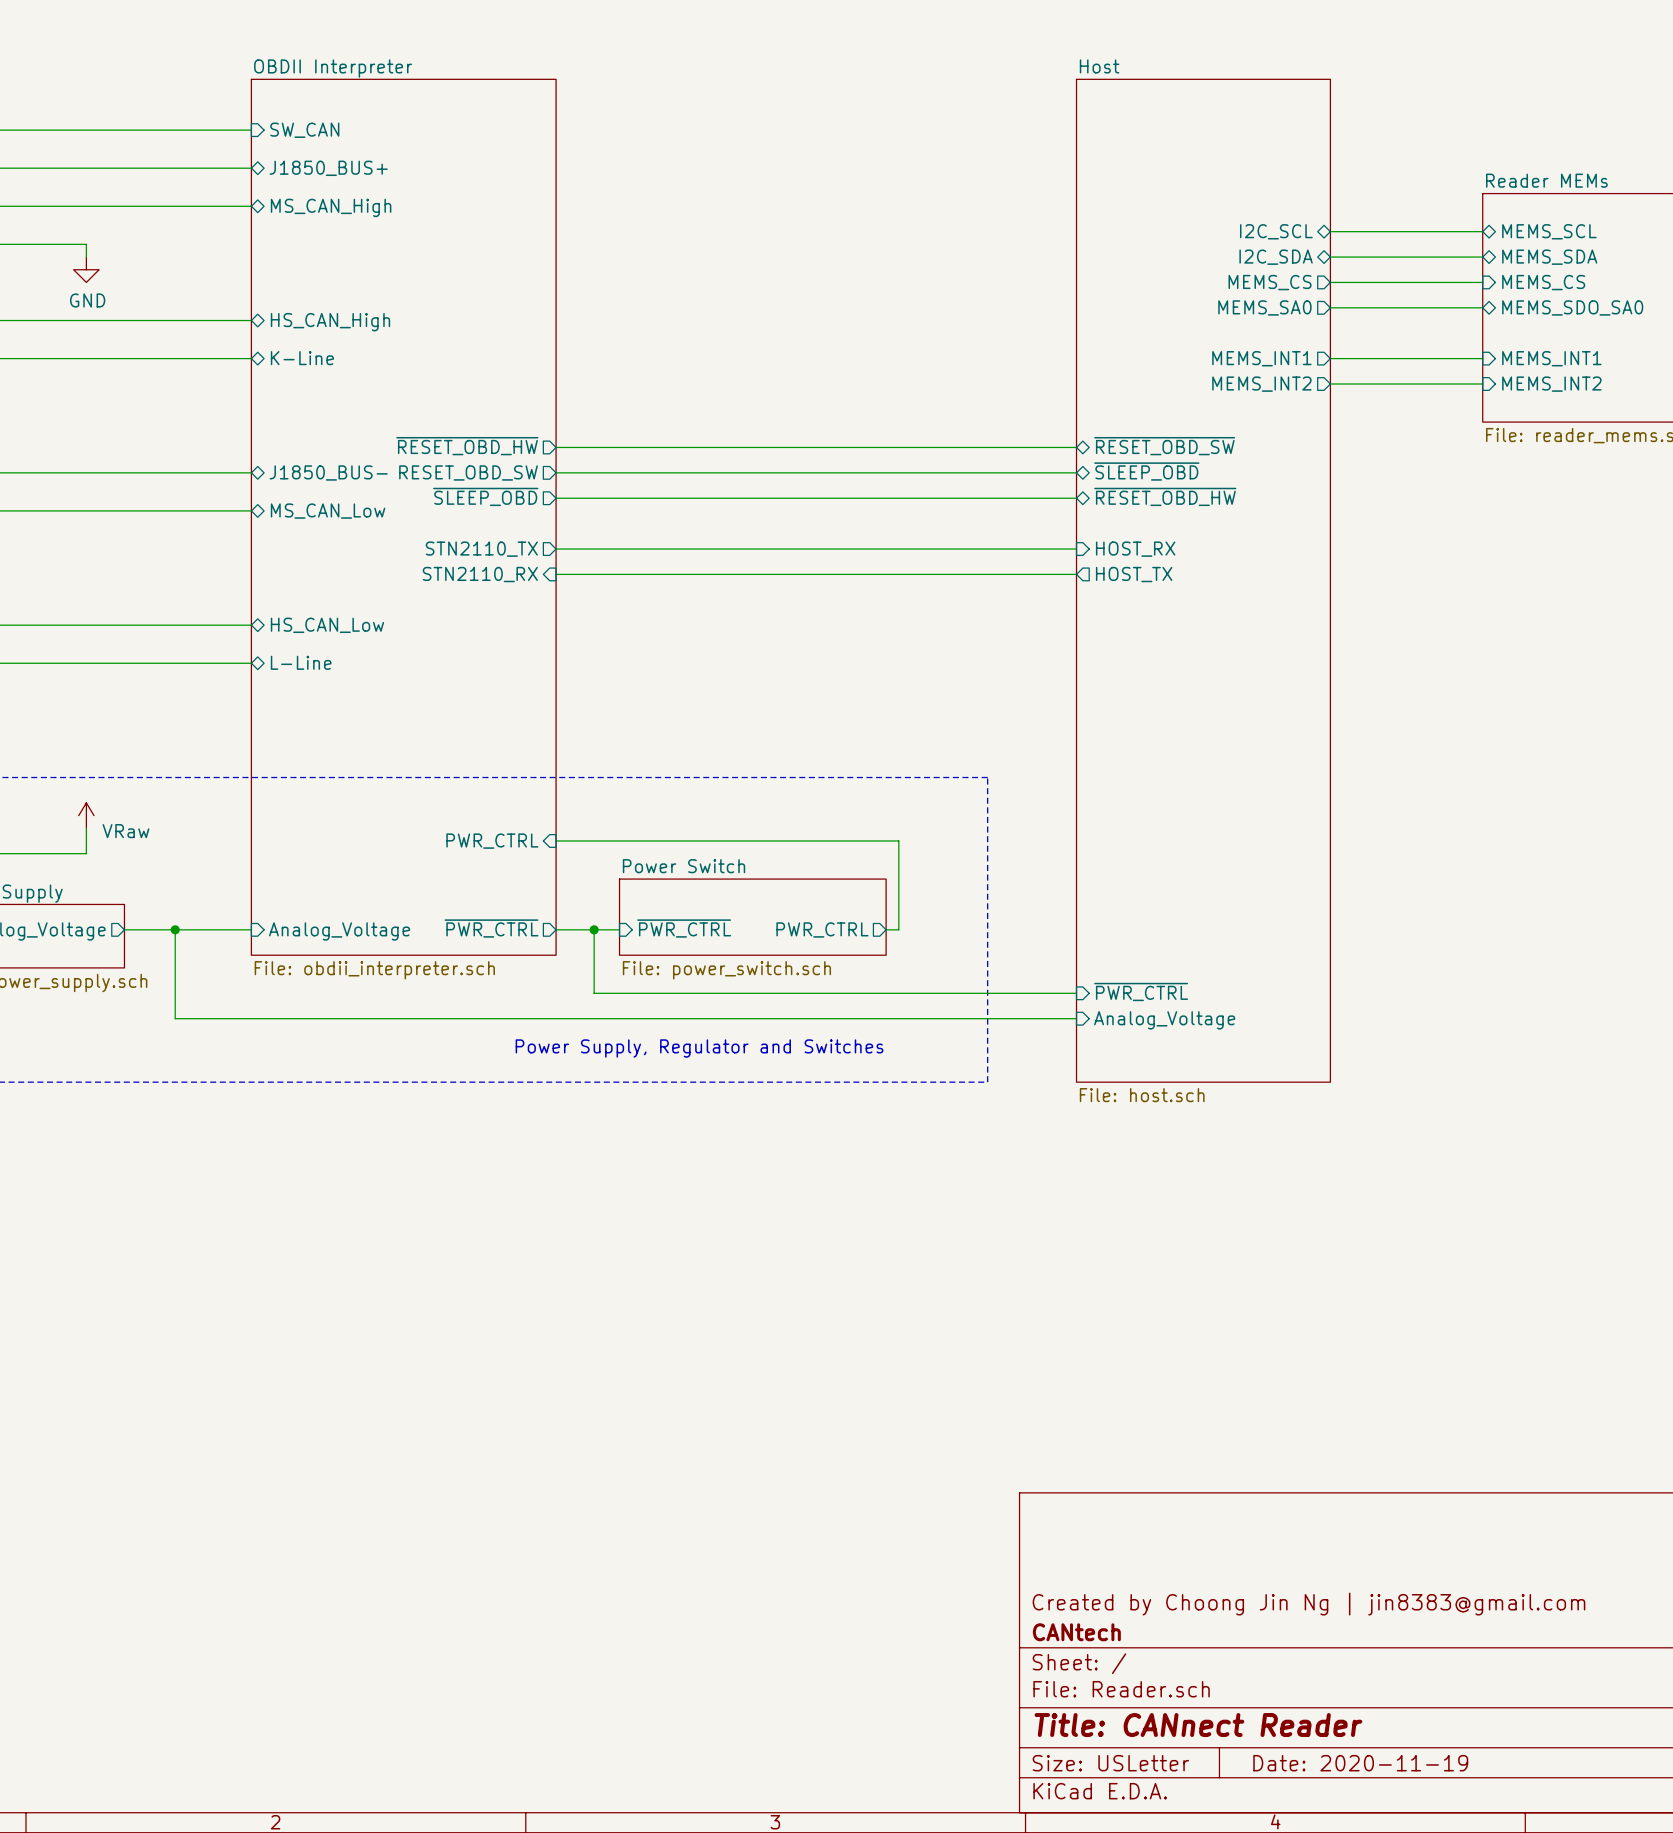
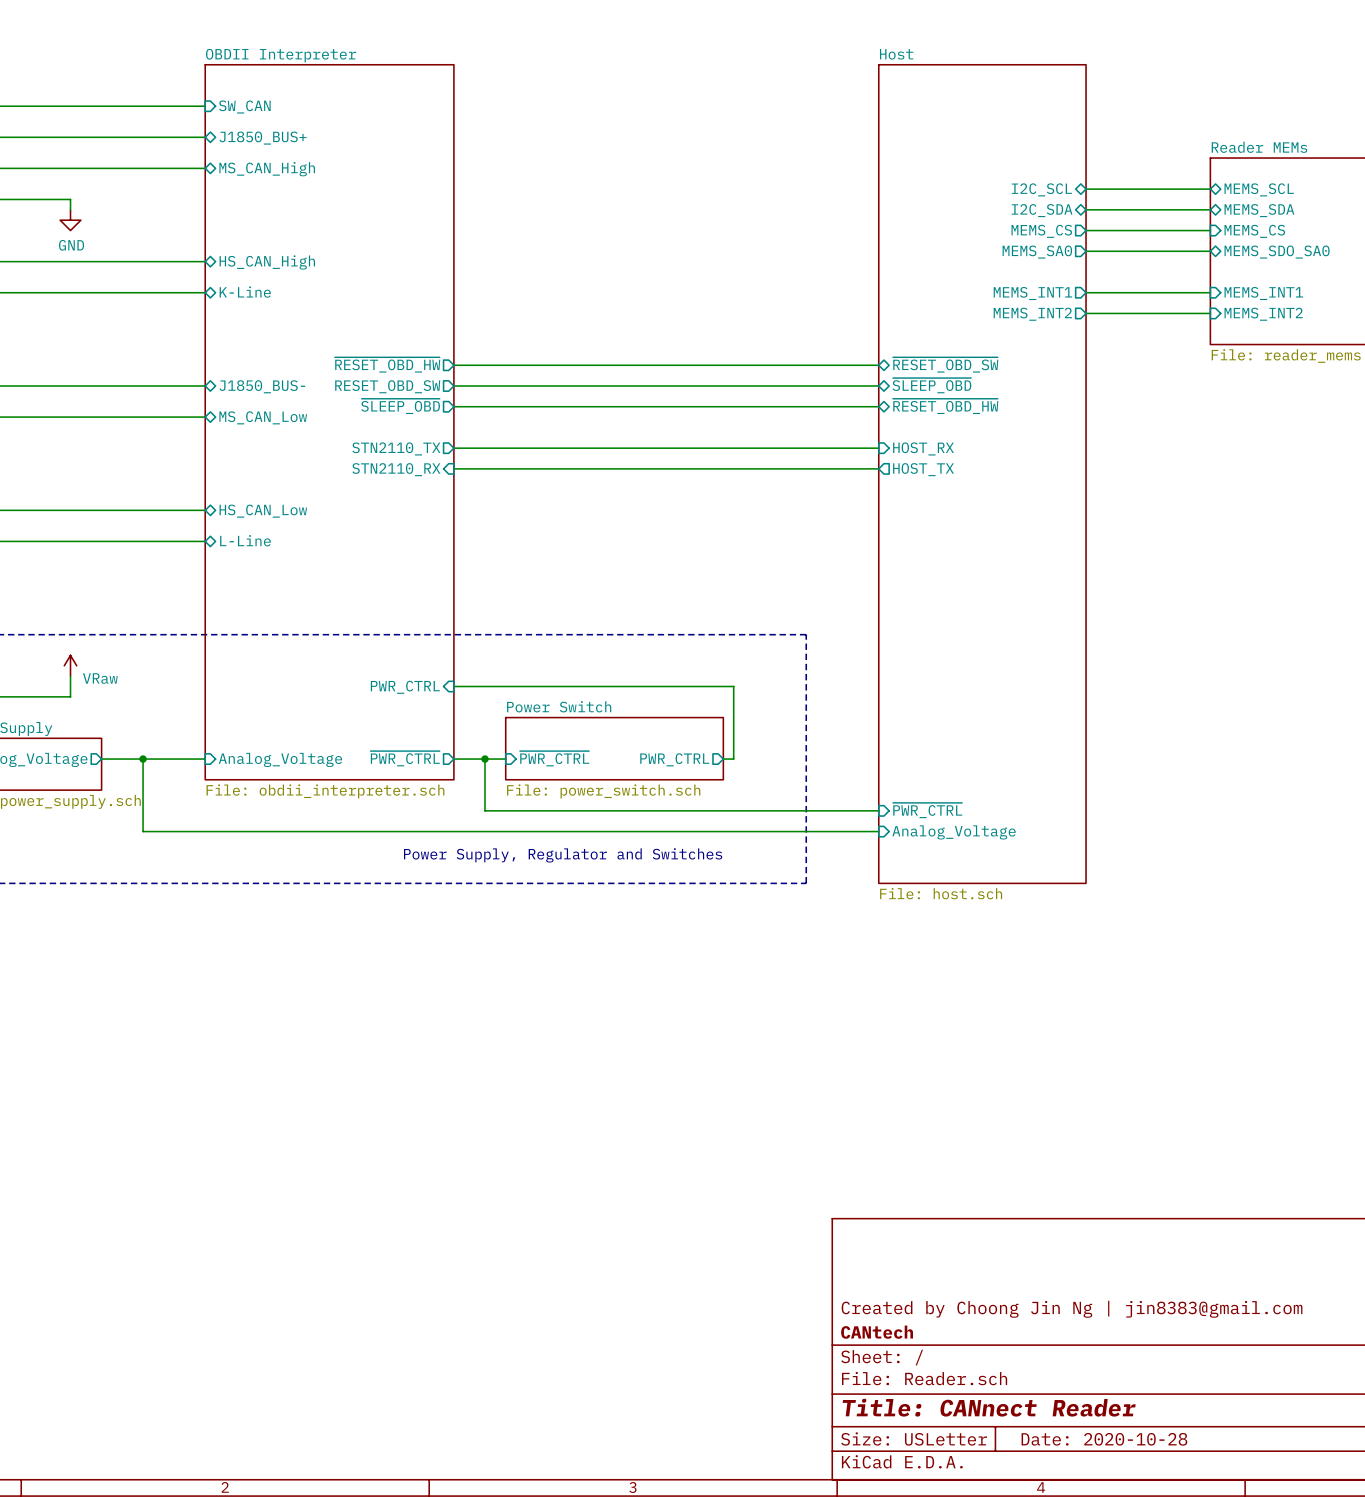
title block: Date: 2020-11-19 (1360, 1763) -> Date: 2020-10-28 (1104, 1439)

